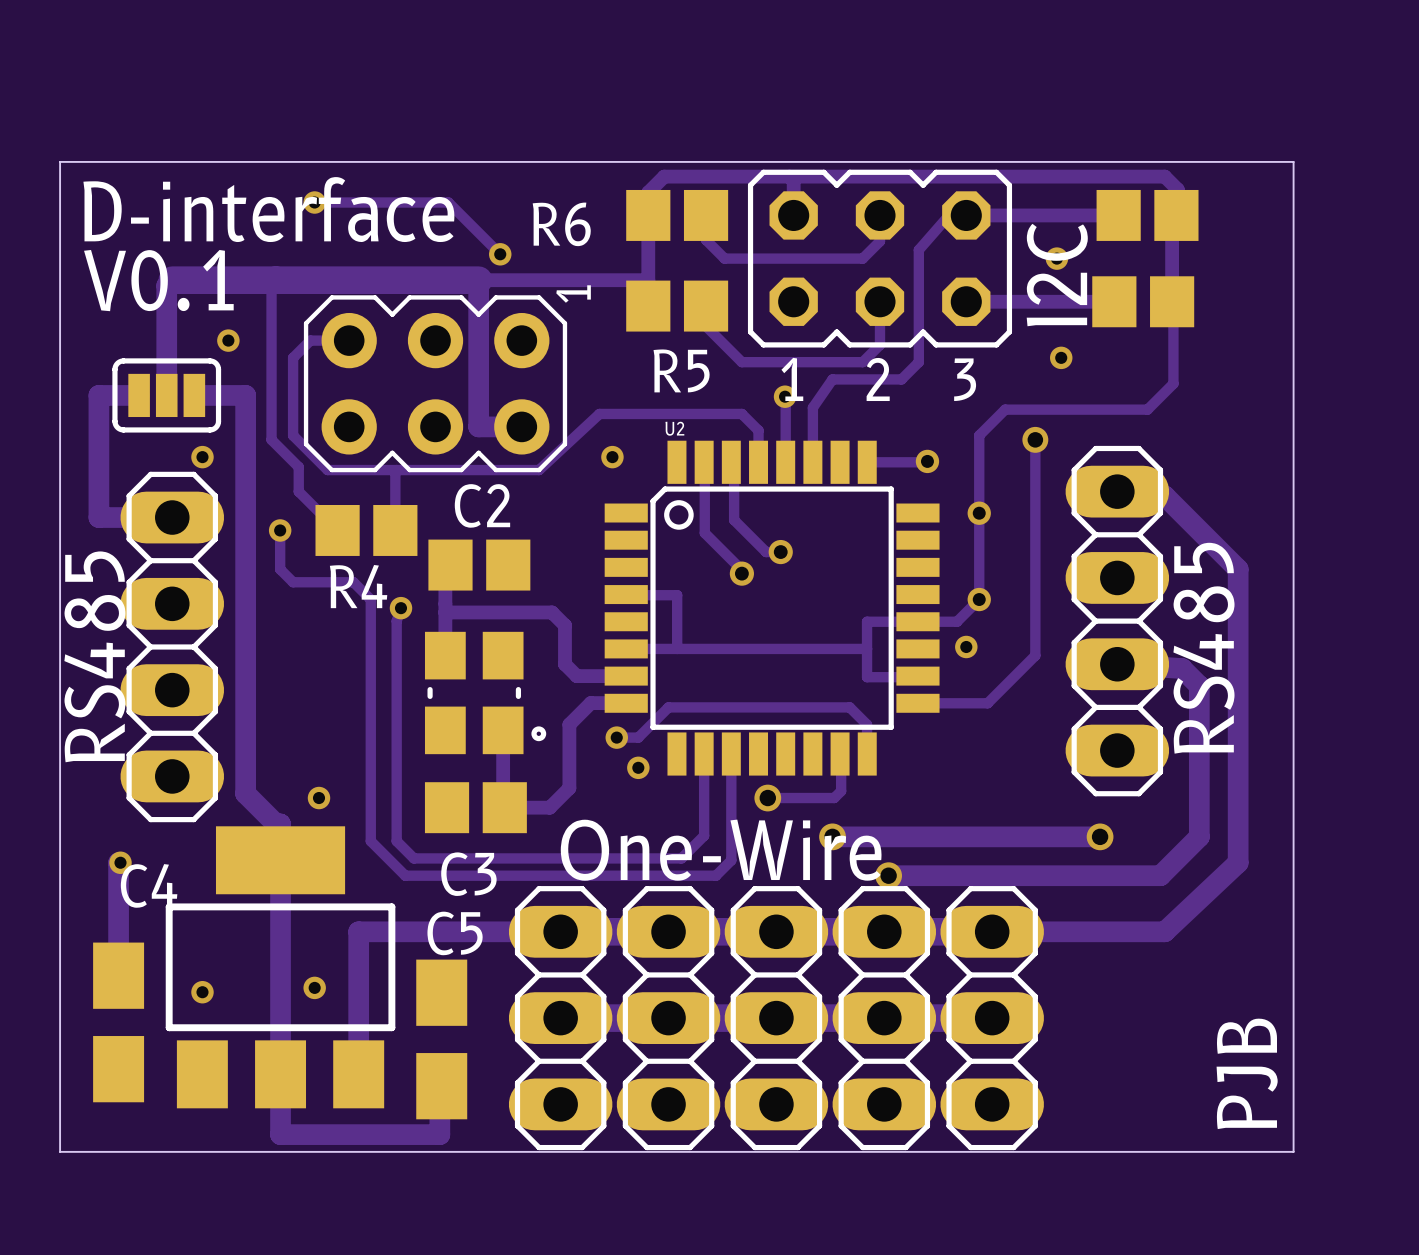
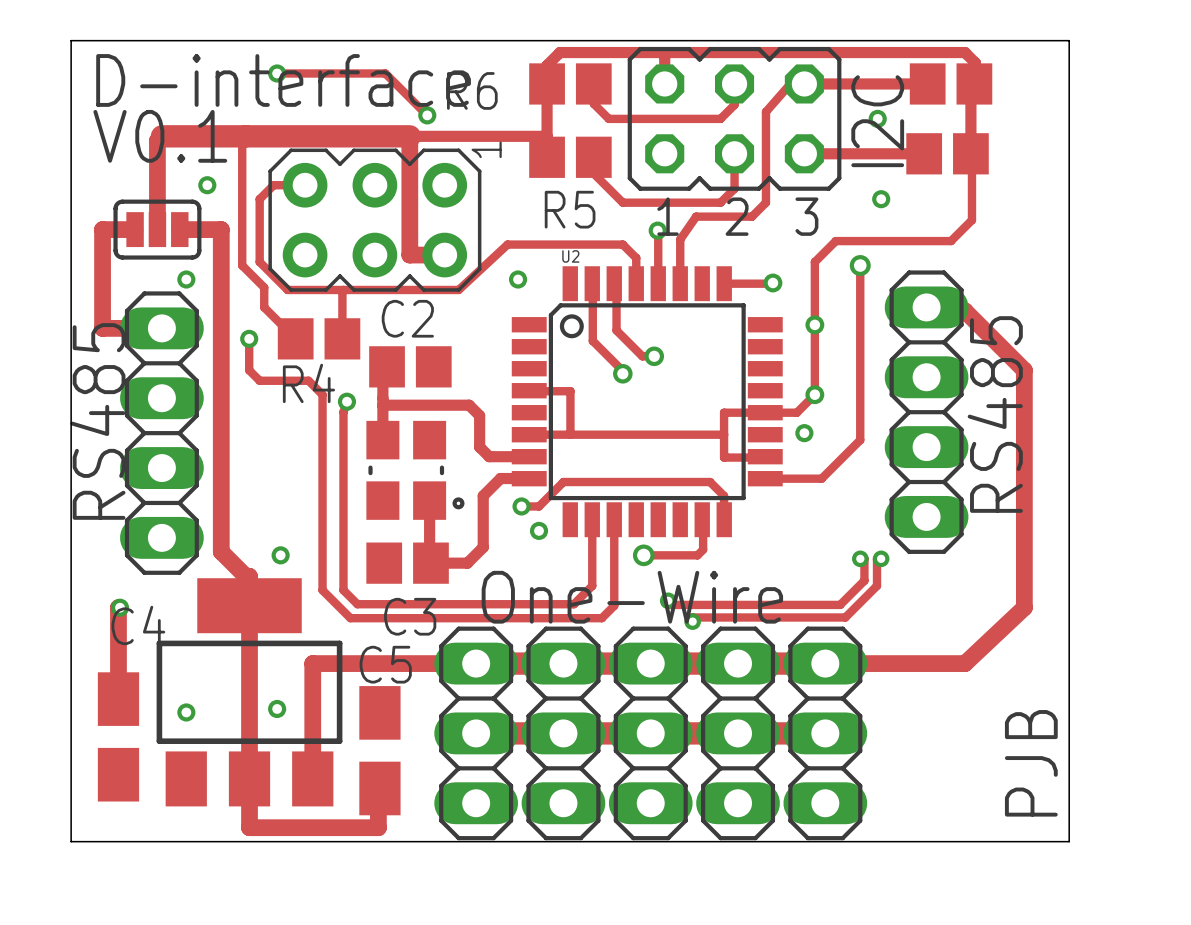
track: (1117, 664) (1182, 668) (1199, 685) (1199, 836) (1160, 875) (888, 875) -> none
track: none -> (860, 558) (864, 558) (864, 580) (840, 604) (668, 604) (668, 600)
via: none -> (860, 558)
track: none -> (881, 558) (877, 558) (877, 585) (845, 617) (692, 617) (692, 621)
via: none -> (881, 558)
track: (832, 836) (1100, 836) -> none
via: (832, 836) -> none
via: (1100, 836) -> none
via: none -> (668, 600)
via: (888, 875) -> none
via: none -> (692, 621)

